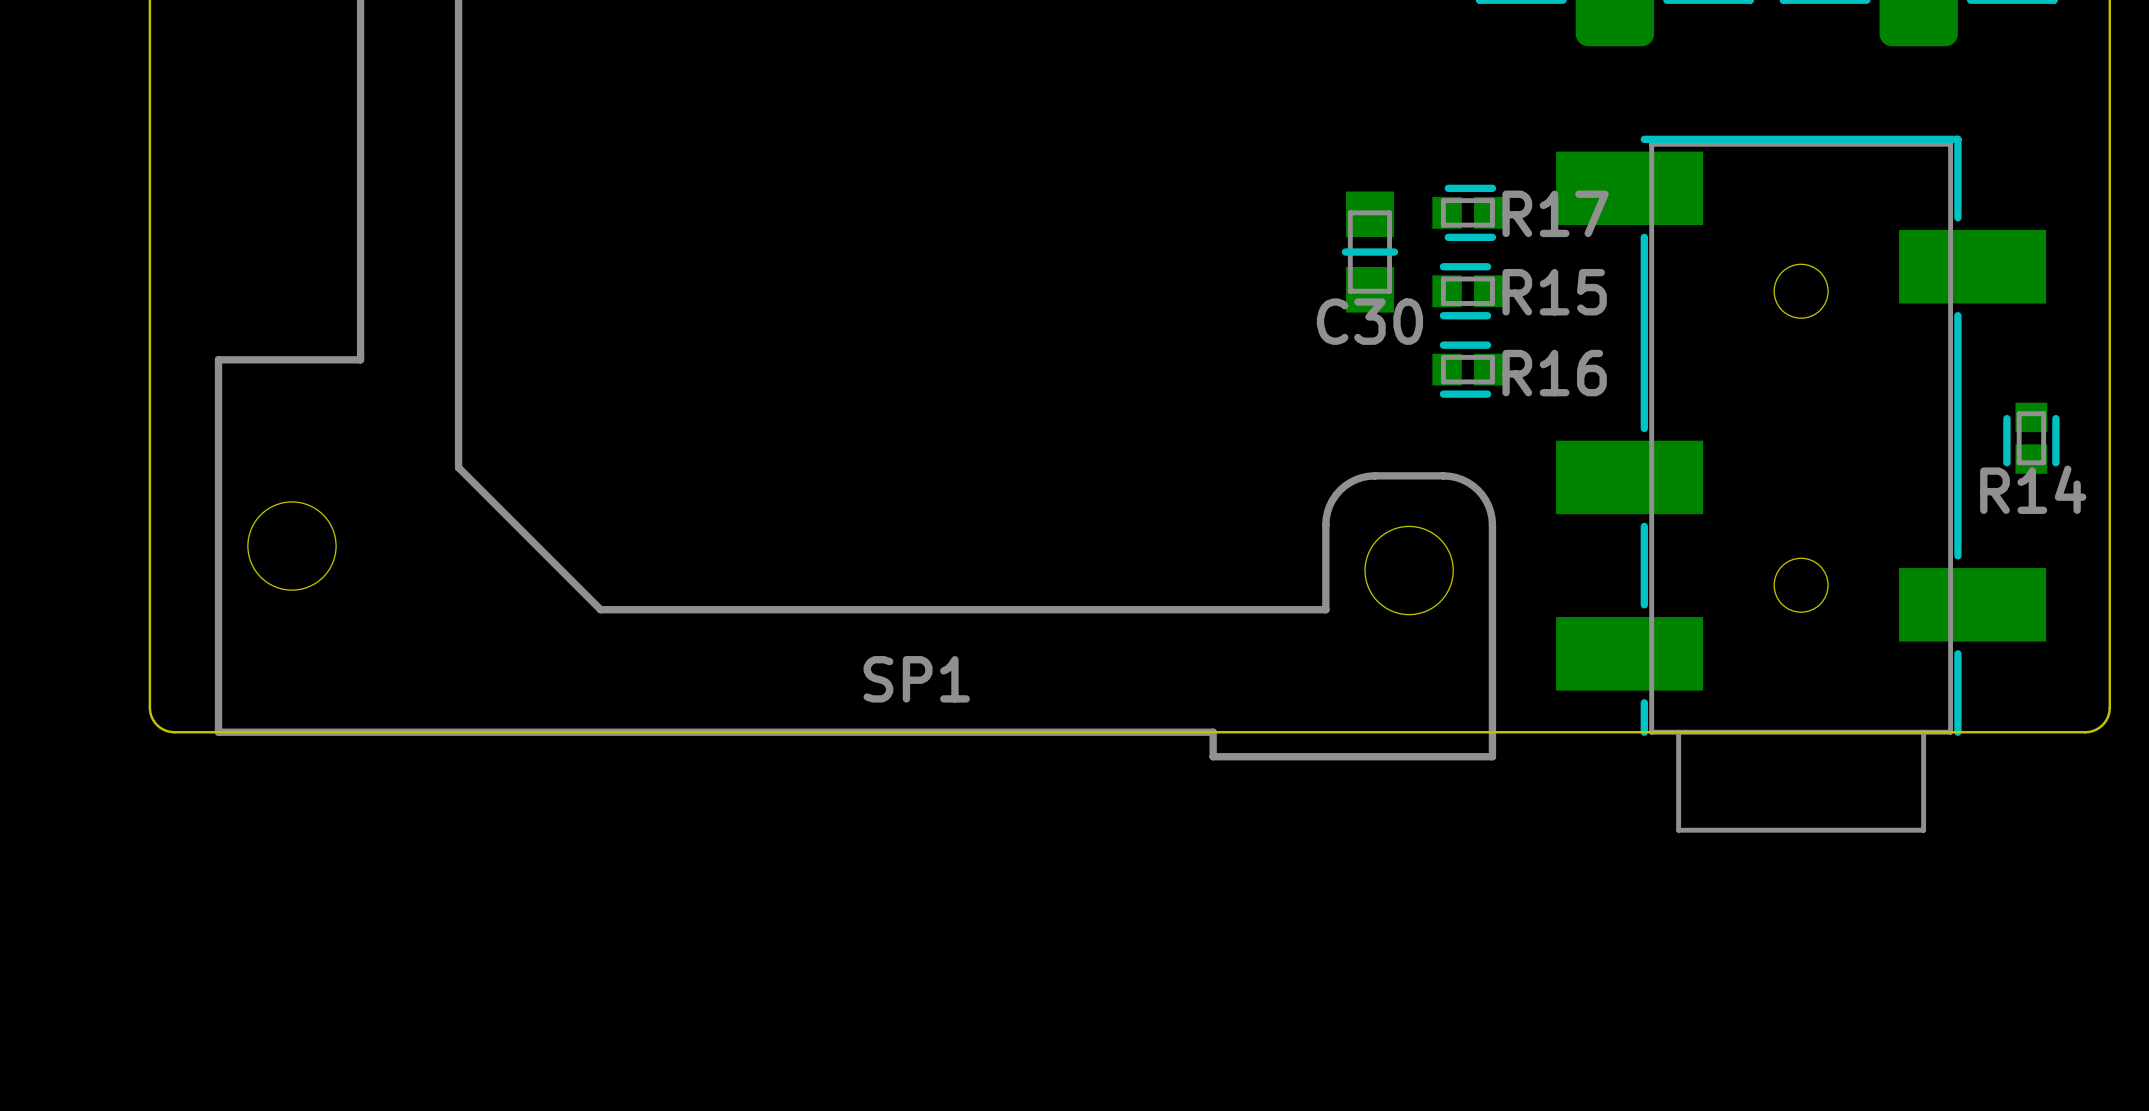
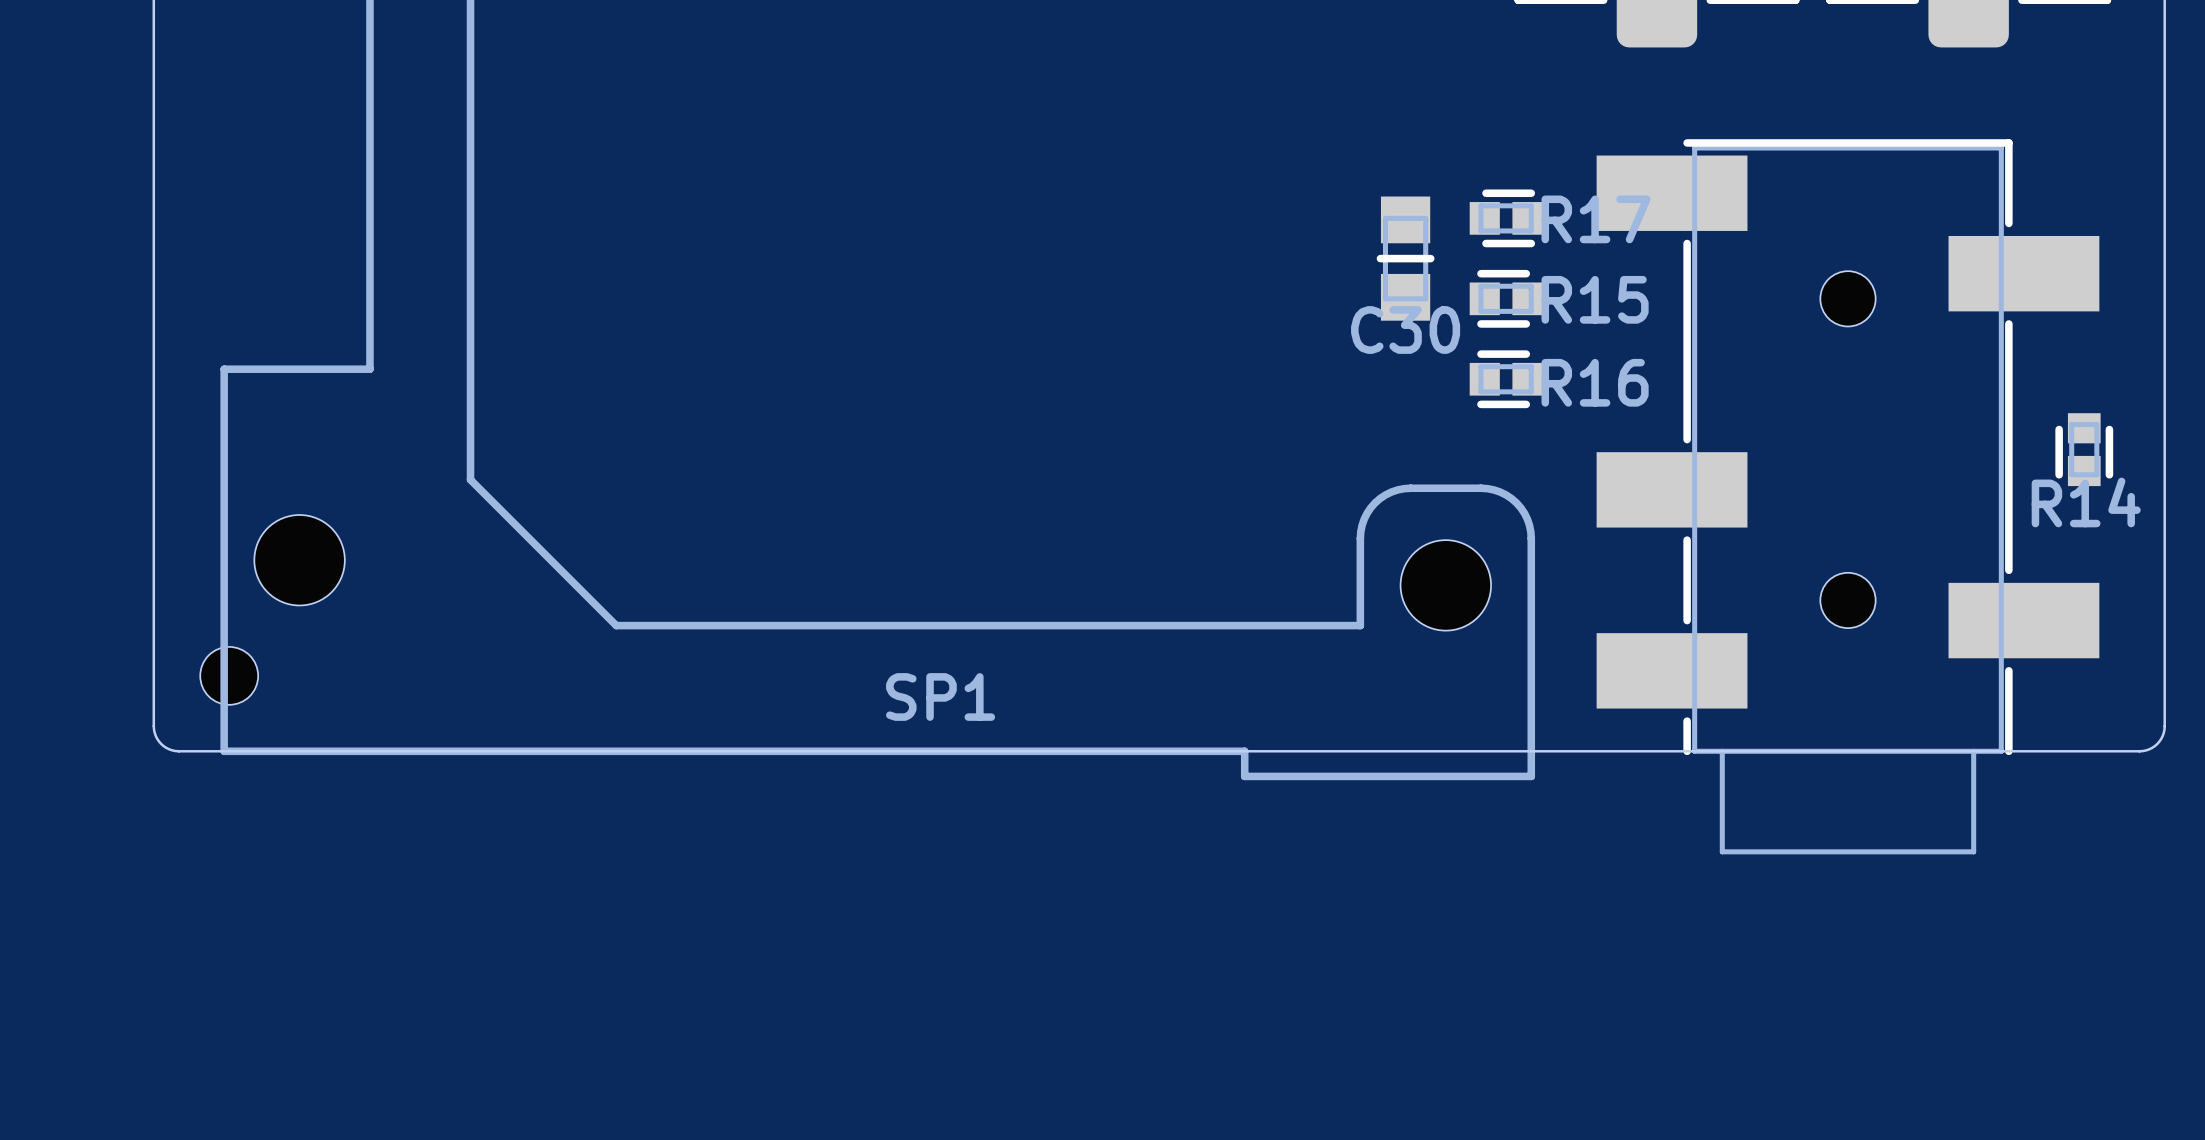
part: none -> (229, 675)

